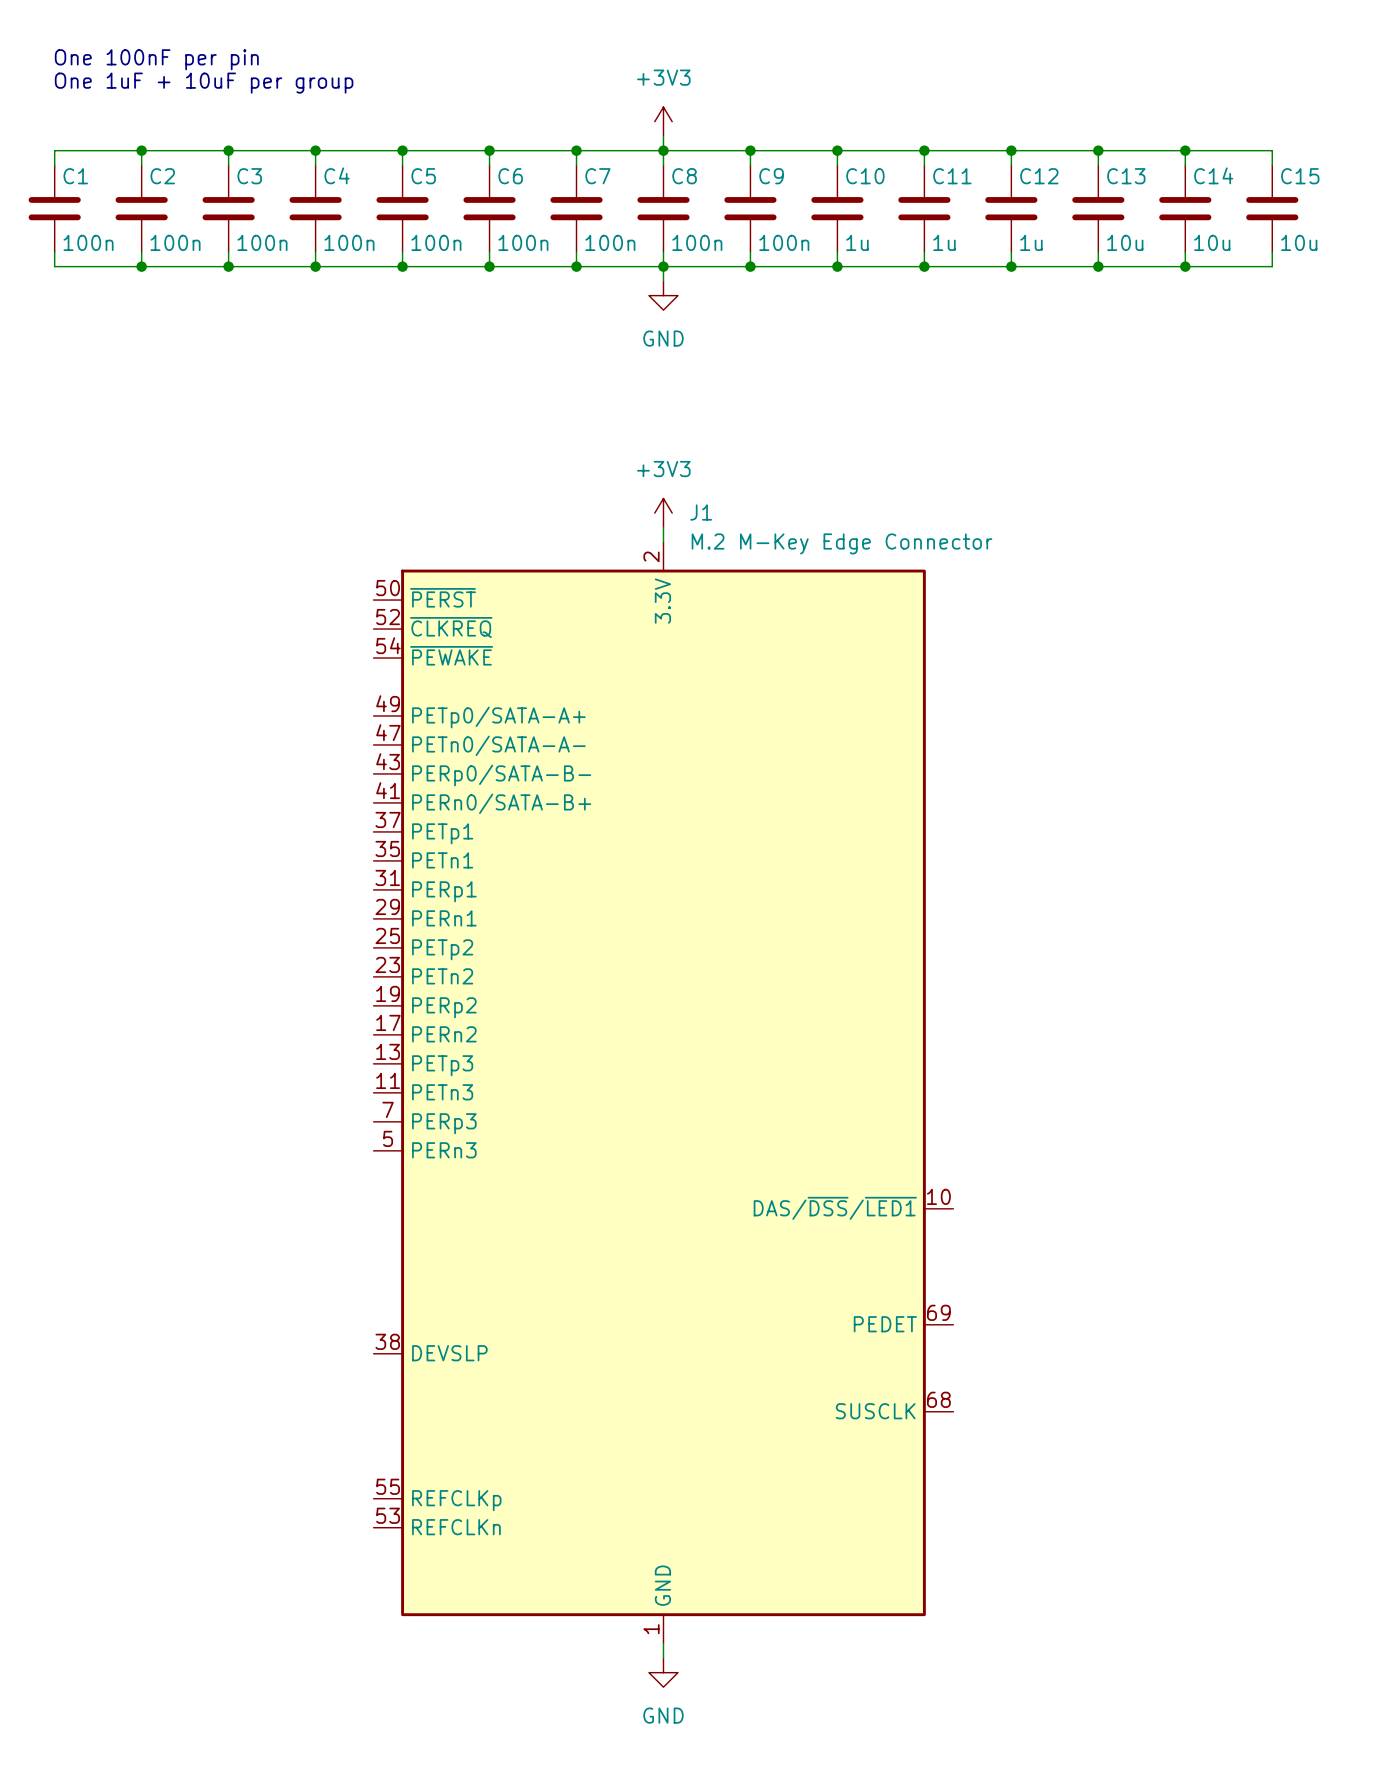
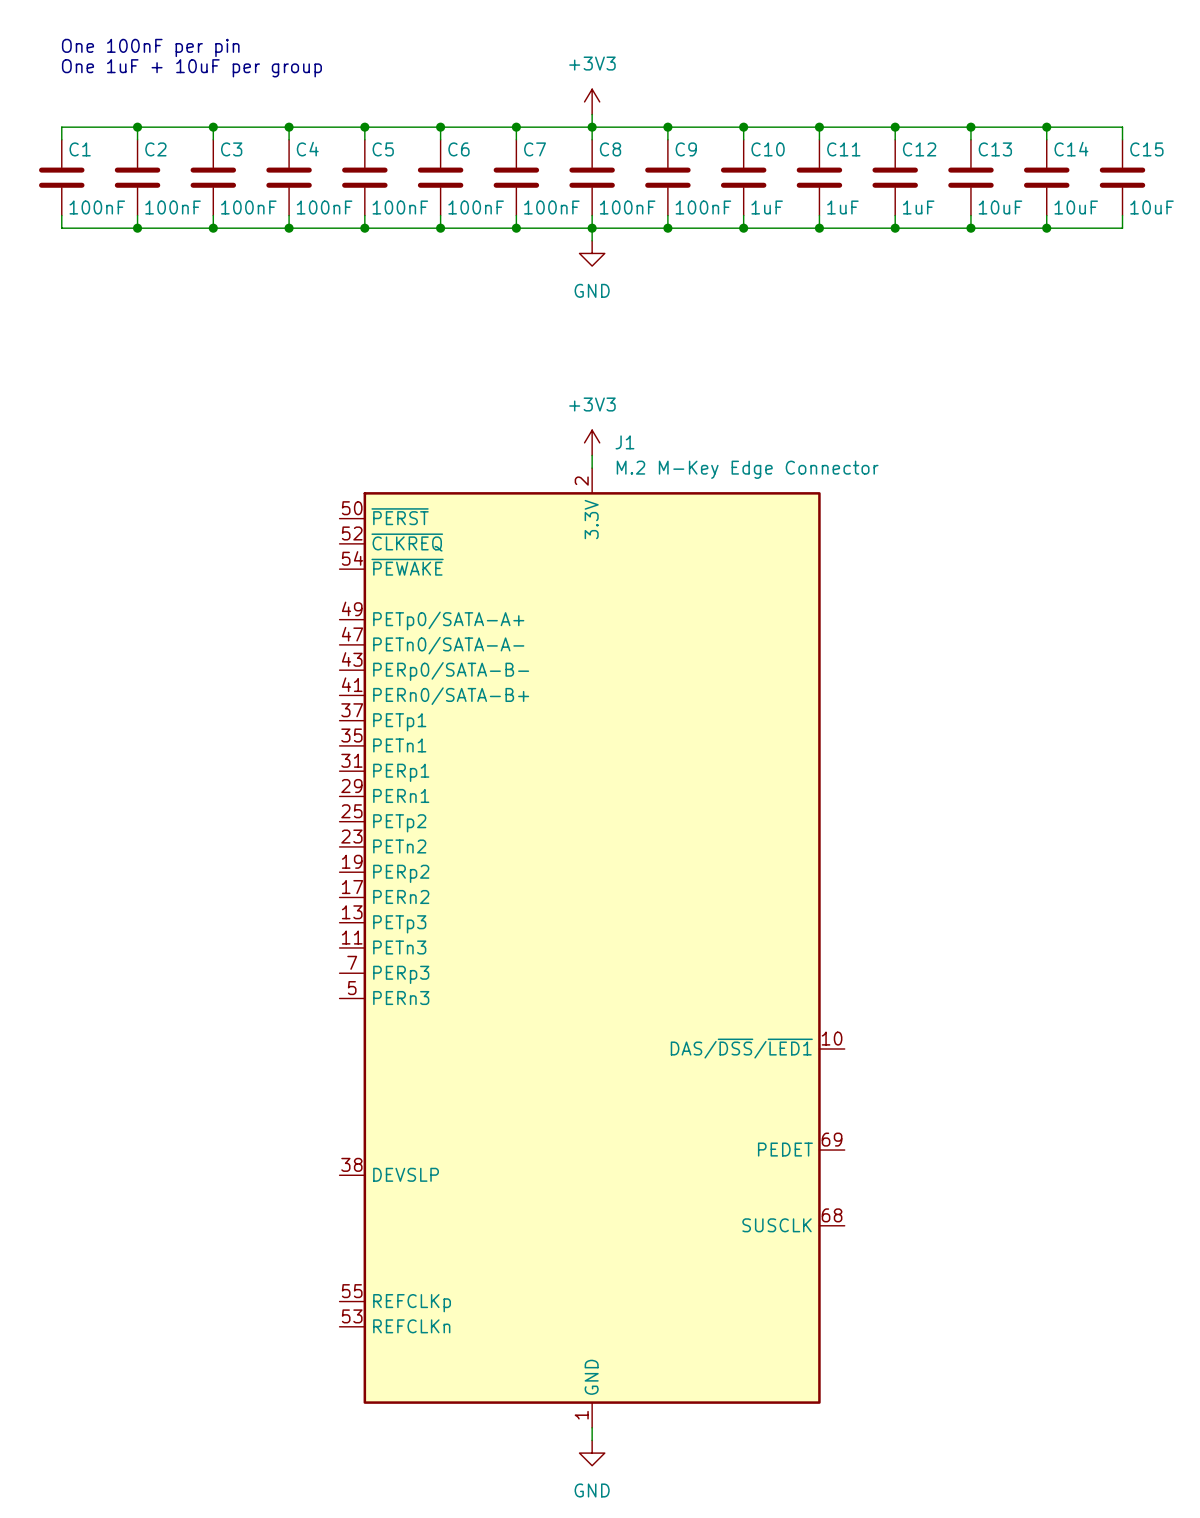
C1 value: 100n (88, 242) -> 100nF (97, 207)
C2 value: 100n (175, 242) -> 100nF (173, 207)
C3 value: 100n (262, 242) -> 100nF (248, 207)
C4 value: 100n (349, 242) -> 100nF (324, 207)
C5 value: 100n (436, 242) -> 100nF (400, 207)
C6 value: 100n (523, 242) -> 100nF (476, 207)
C7 value: 100n (610, 242) -> 100nF (551, 207)
C8 value: 100n (697, 242) -> 100nF (627, 207)
C9 value: 100n (784, 242) -> 100nF (703, 207)
C10 value: 1u (857, 242) -> 1uF (767, 207)
C11 value: 1u (944, 242) -> 1uF (842, 207)
C12 value: 1u (1031, 242) -> 1uF (918, 207)
C13 value: 10u (1125, 242) -> 10uF (1000, 207)
C14 value: 10u (1212, 242) -> 10uF (1076, 207)
C15 value: 10u (1299, 242) -> 10uF (1152, 207)

